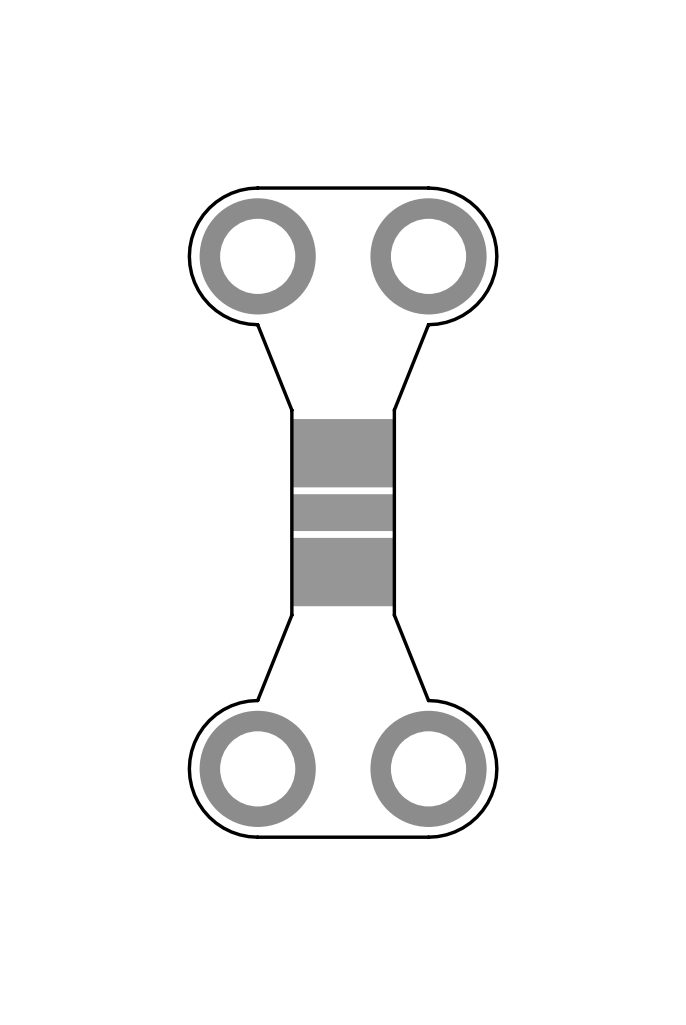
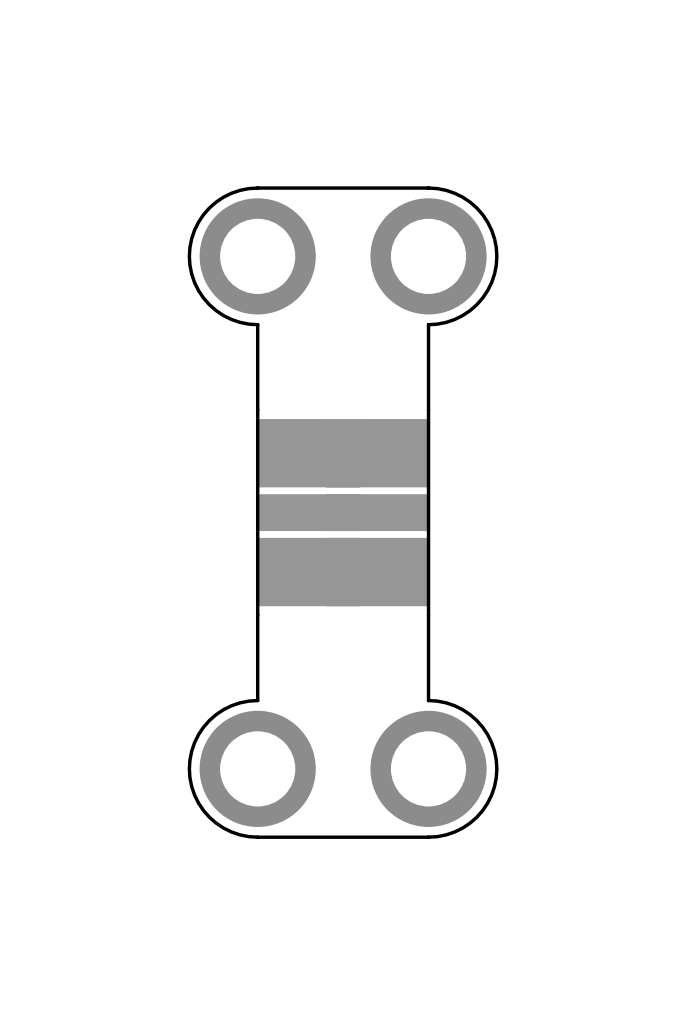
board edge: (257, 324) (291, 410) (291, 615) (257, 700) -> (257, 324) (257, 700)
board edge: (428, 324) (394, 410) (394, 615) (428, 700) -> (428, 324) (428, 700)
part: none -> (308, 512)
part: (343, 512) -> none
part: none -> (377, 512)

